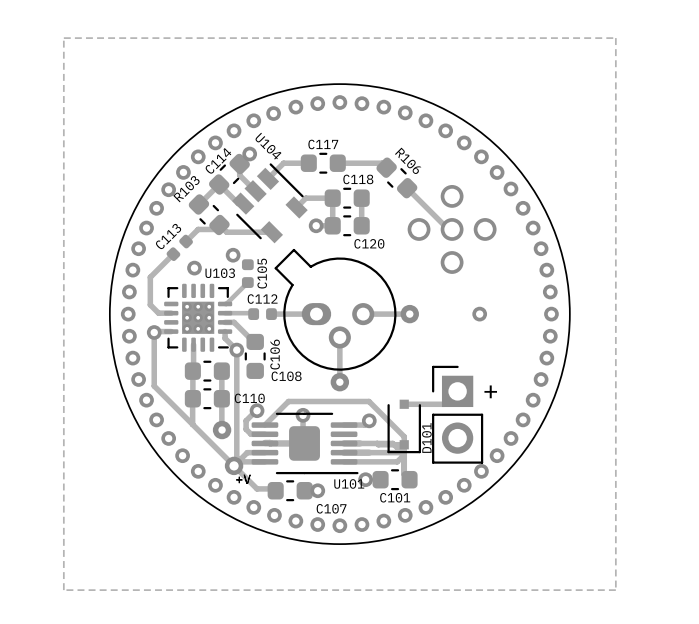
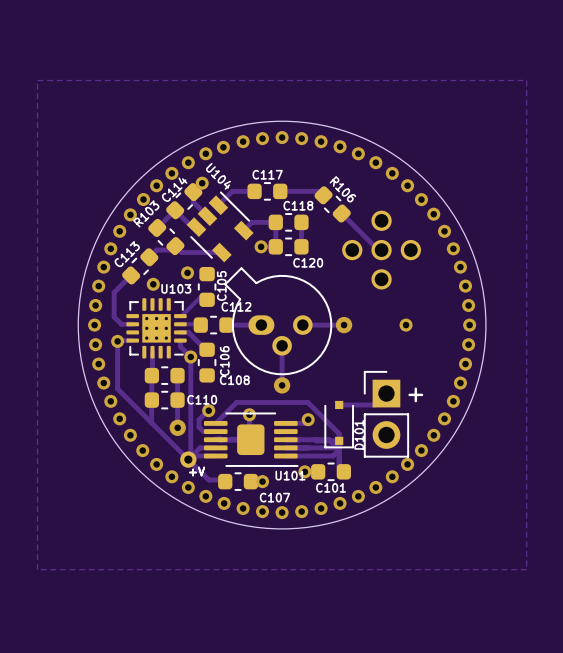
C113 footprint: [166, 234, 193, 262] -> [122, 248, 159, 285]
C105 footprint: [241, 259, 254, 288] -> [197, 267, 217, 307]
C112 footprint: [248, 308, 277, 320] -> [193, 315, 234, 335]

